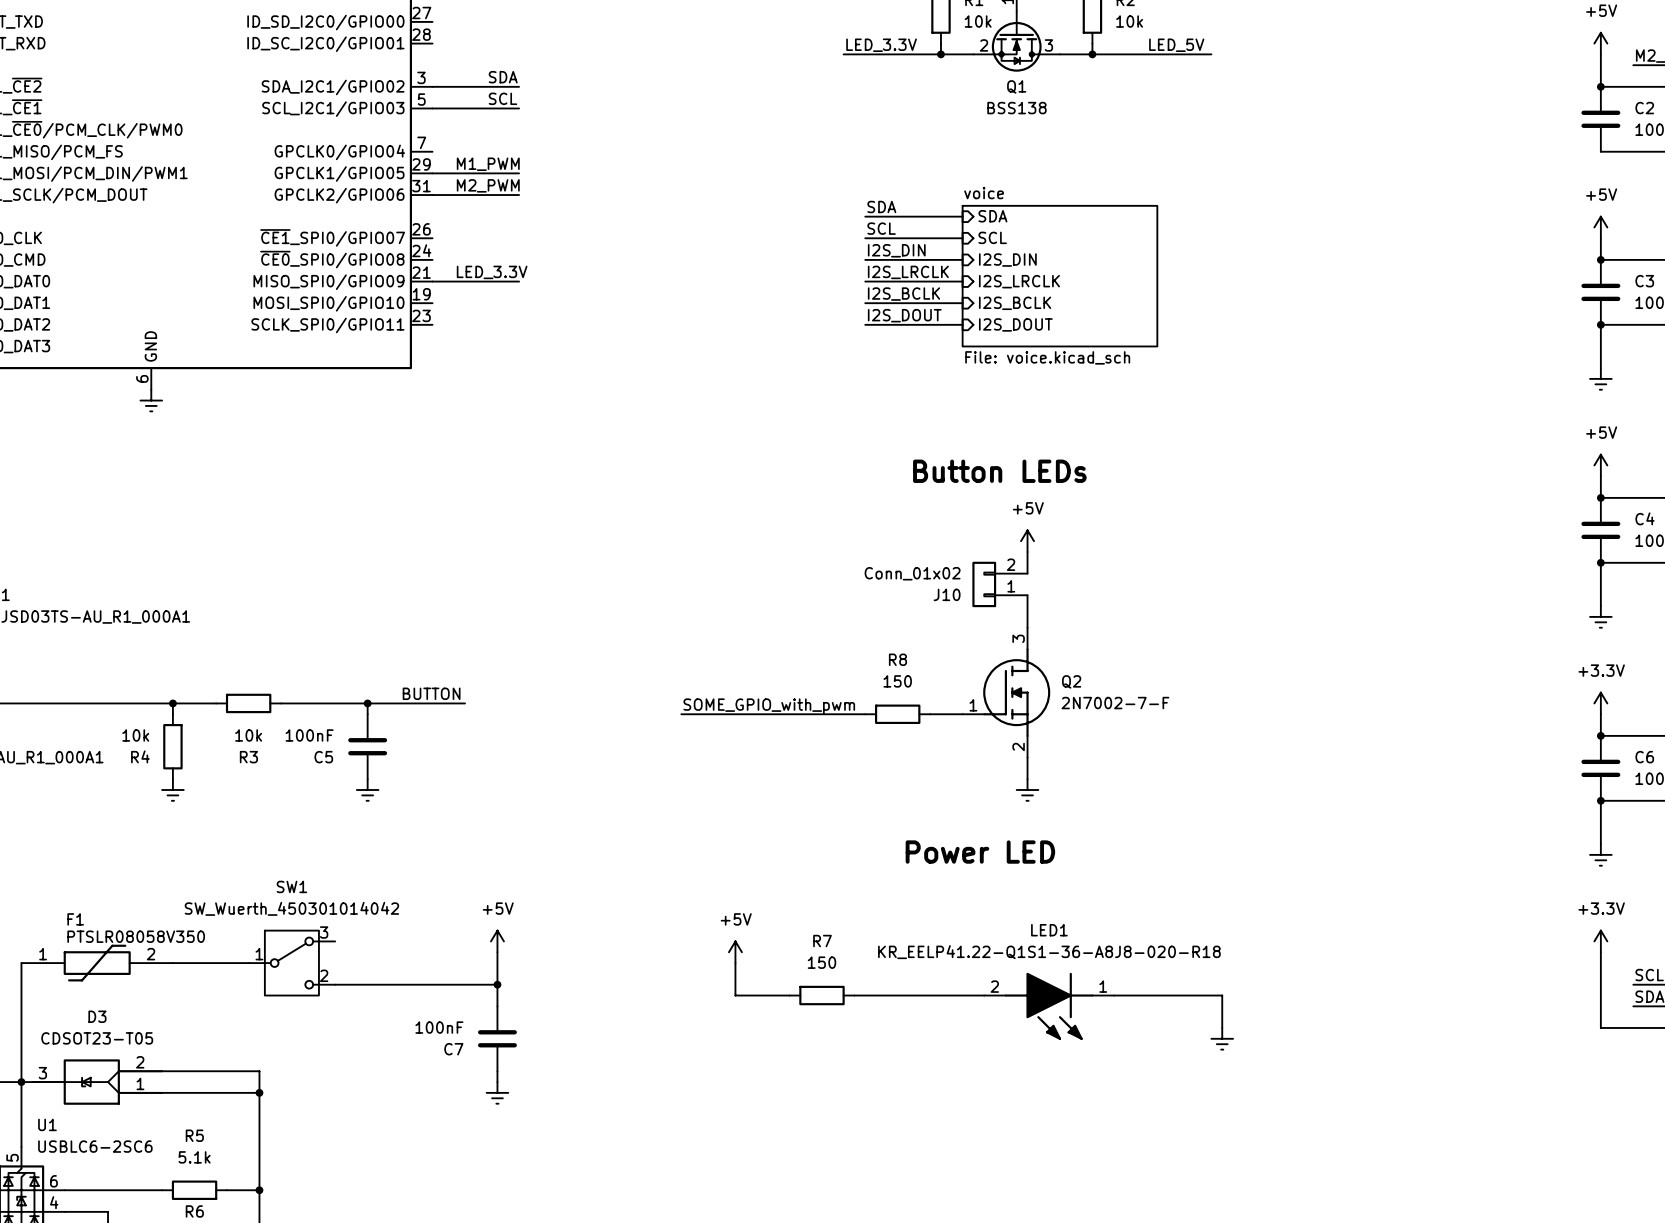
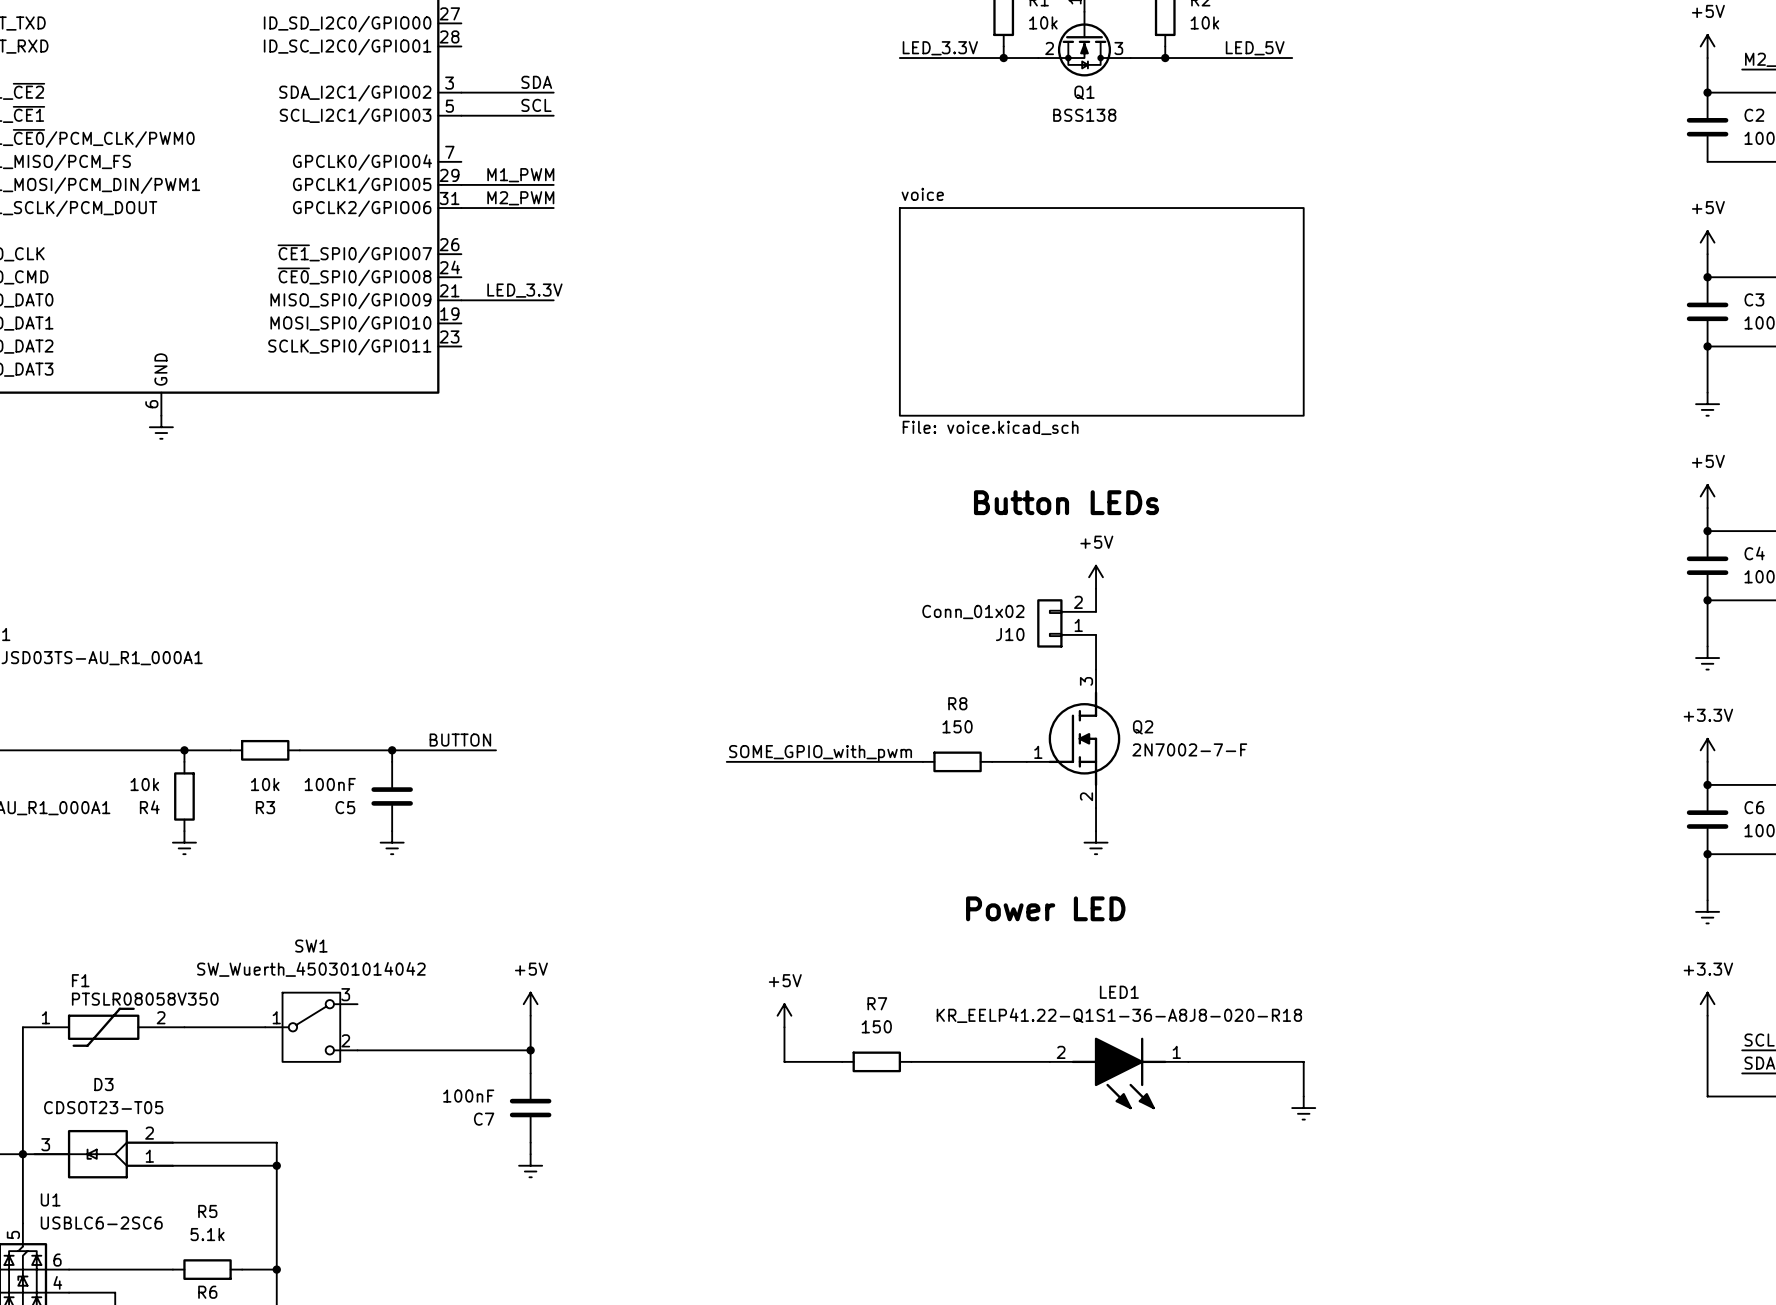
label: SDA (881, 206) -> none
wire: (865, 216) (962, 216) -> none
sheet pin: SDA (992, 216) -> none
label: SCL (881, 228) -> none
sheet pin: SCL (992, 237) -> none
wire: (865, 238) (962, 238) -> none
label: I2S_DIN (896, 250) -> none
wire: (865, 259) (962, 259) -> none
sheet pin: I2S_DIN (1007, 260) -> none
label: I2S_LRCLK (908, 272) -> none
sheet voice: File: voice.kicad_sch (1059, 276) -> none
wire: (865, 281) (962, 281) -> none
sheet pin: I2S_LRCLK (1019, 281) -> none
sheet voice: none -> File: voice.kicad_sch (1101, 311)
label: I2S_BCLK (903, 294) -> none
wire: (865, 303) (962, 303) -> none
sheet pin: I2S_BCLK (1015, 303) -> none
label: I2S_DOUT (904, 315) -> none
wire: (865, 324) (962, 324) -> none
sheet pin: I2S_DOUT (1015, 324) -> none

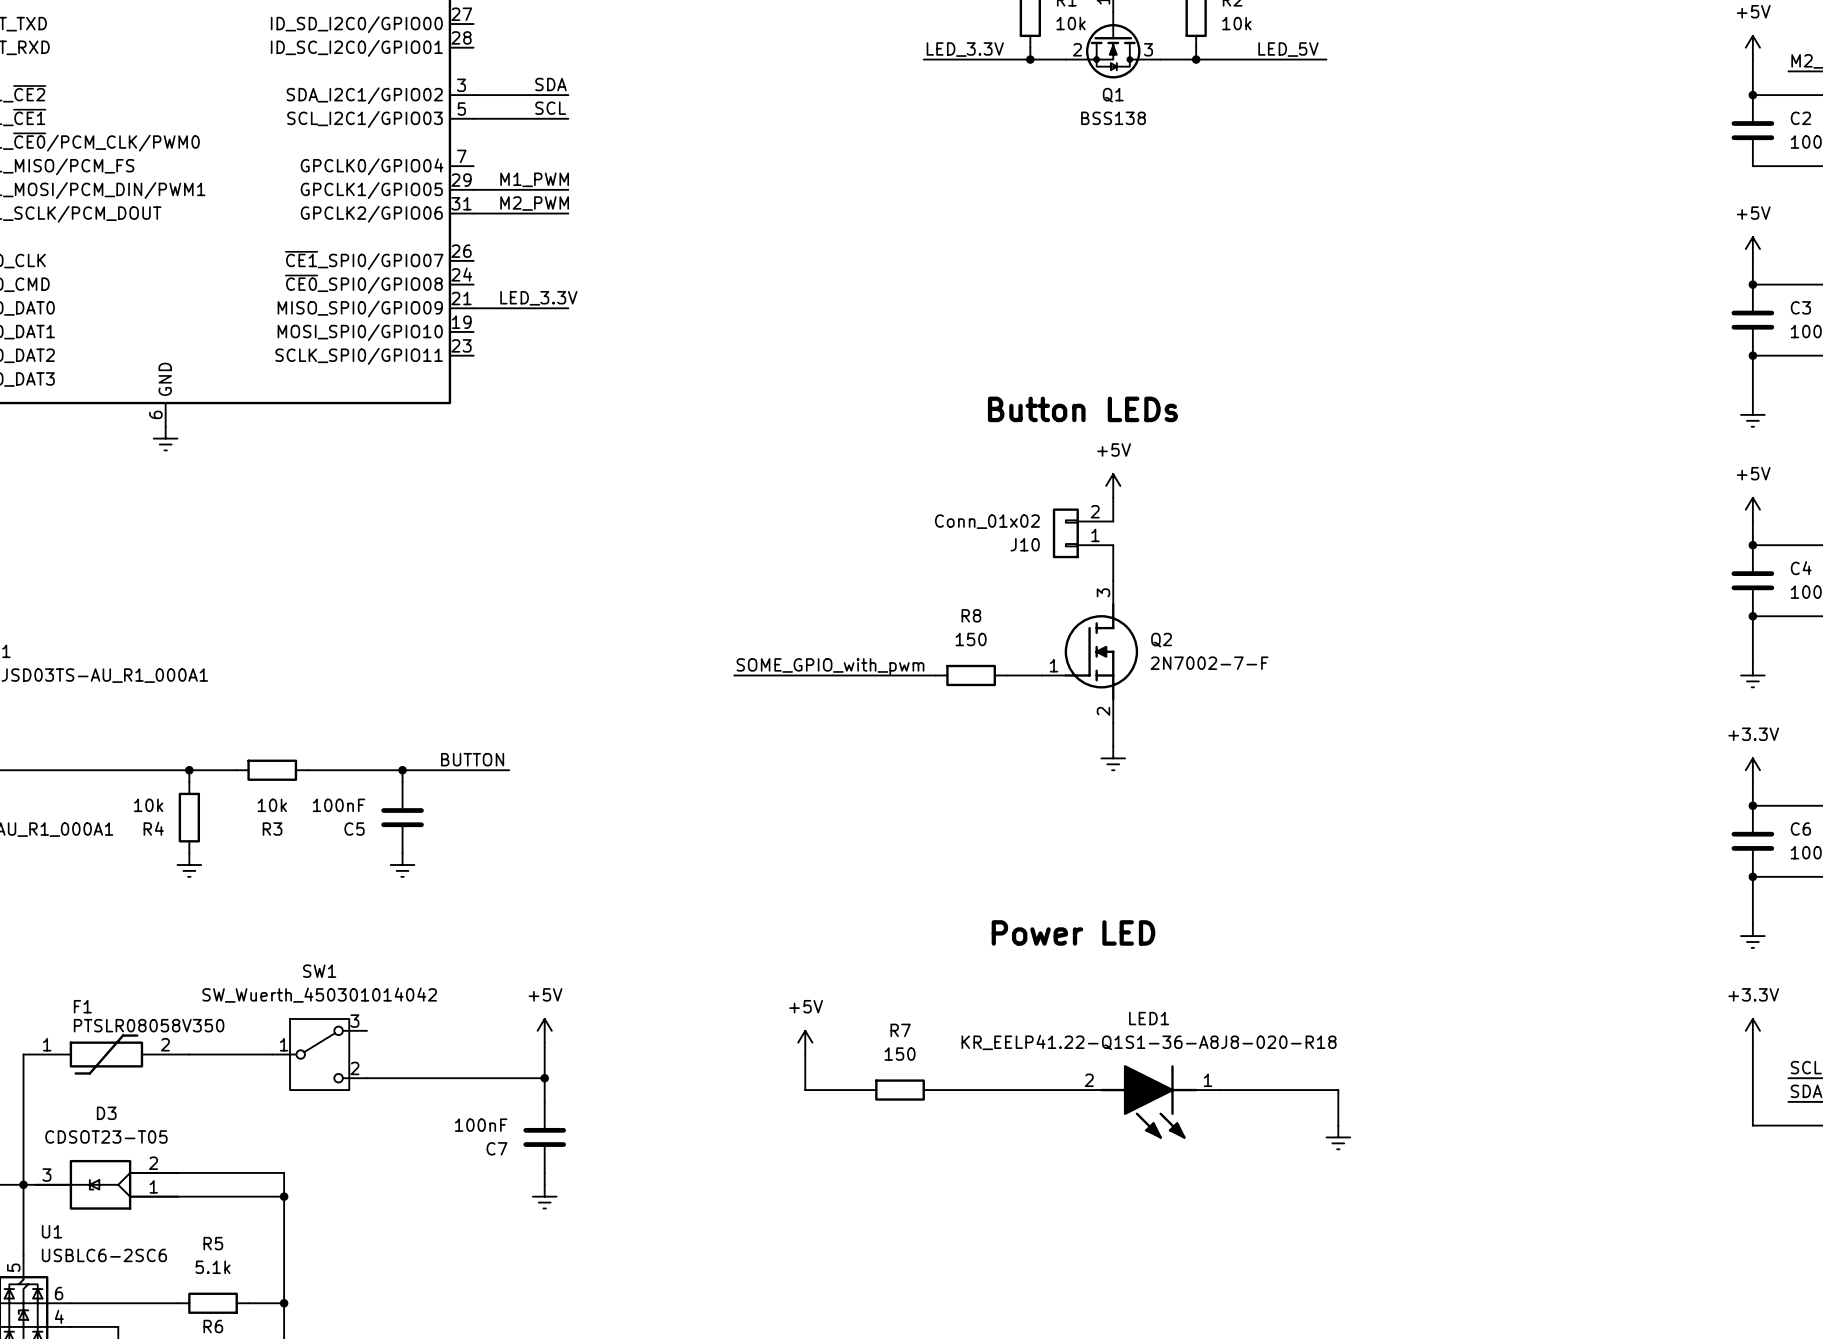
sheet voice: File: voice.kicad_sch (1101, 311) -> none
text position: Button LEDs (1066, 502) -> Button LEDs (1082, 409)
power symbol position: +5V (1096, 577) -> +5V (1113, 485)
wire: (1096, 588) (1096, 611) -> (1113, 497) (1113, 521)
J10 position: (1066, 623) -> (1083, 533)
wire: (1096, 634) (1096, 669) -> (1113, 545) (1113, 580)
Q2 position: (1073, 738) -> (1090, 651)
label position: SOME_GPIO_with_pwm (820, 753) -> SOME_GPIO_with_pwm (830, 666)
wire: (726, 761) (922, 761) -> (734, 675) (935, 675)
R8 position: (957, 761) -> (971, 675)
wire: (992, 761) (1026, 761) -> (1006, 675) (1042, 675)
wire: (1096, 808) (1096, 831) -> (1113, 722) (1113, 746)
power symbol position: (1096, 842) -> (1113, 758)

